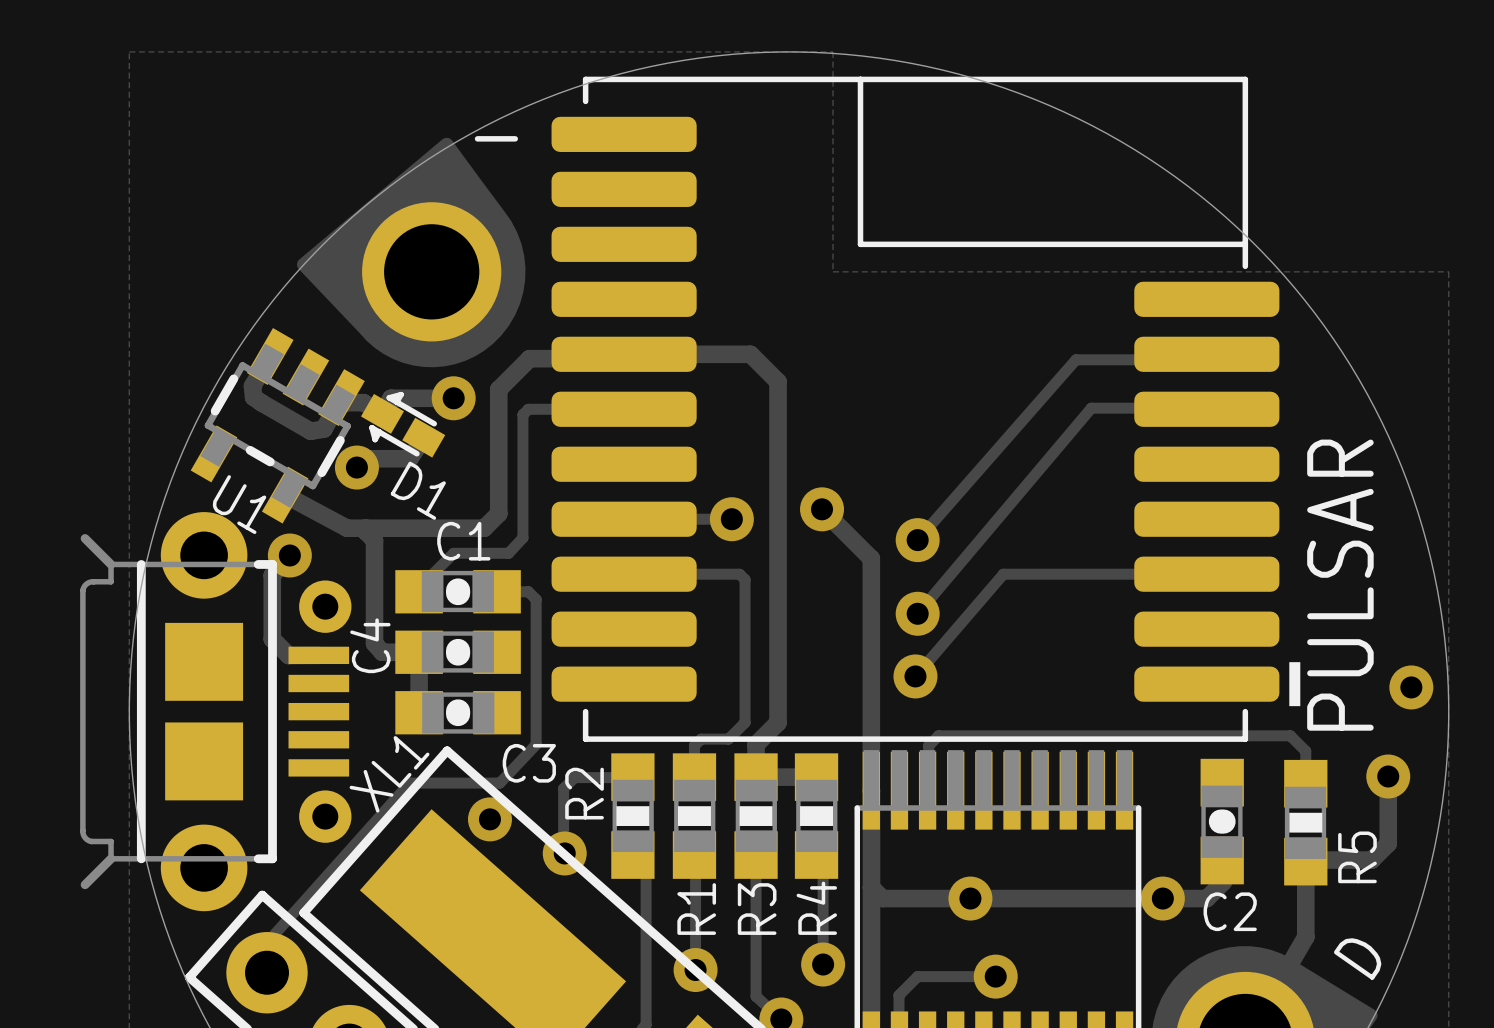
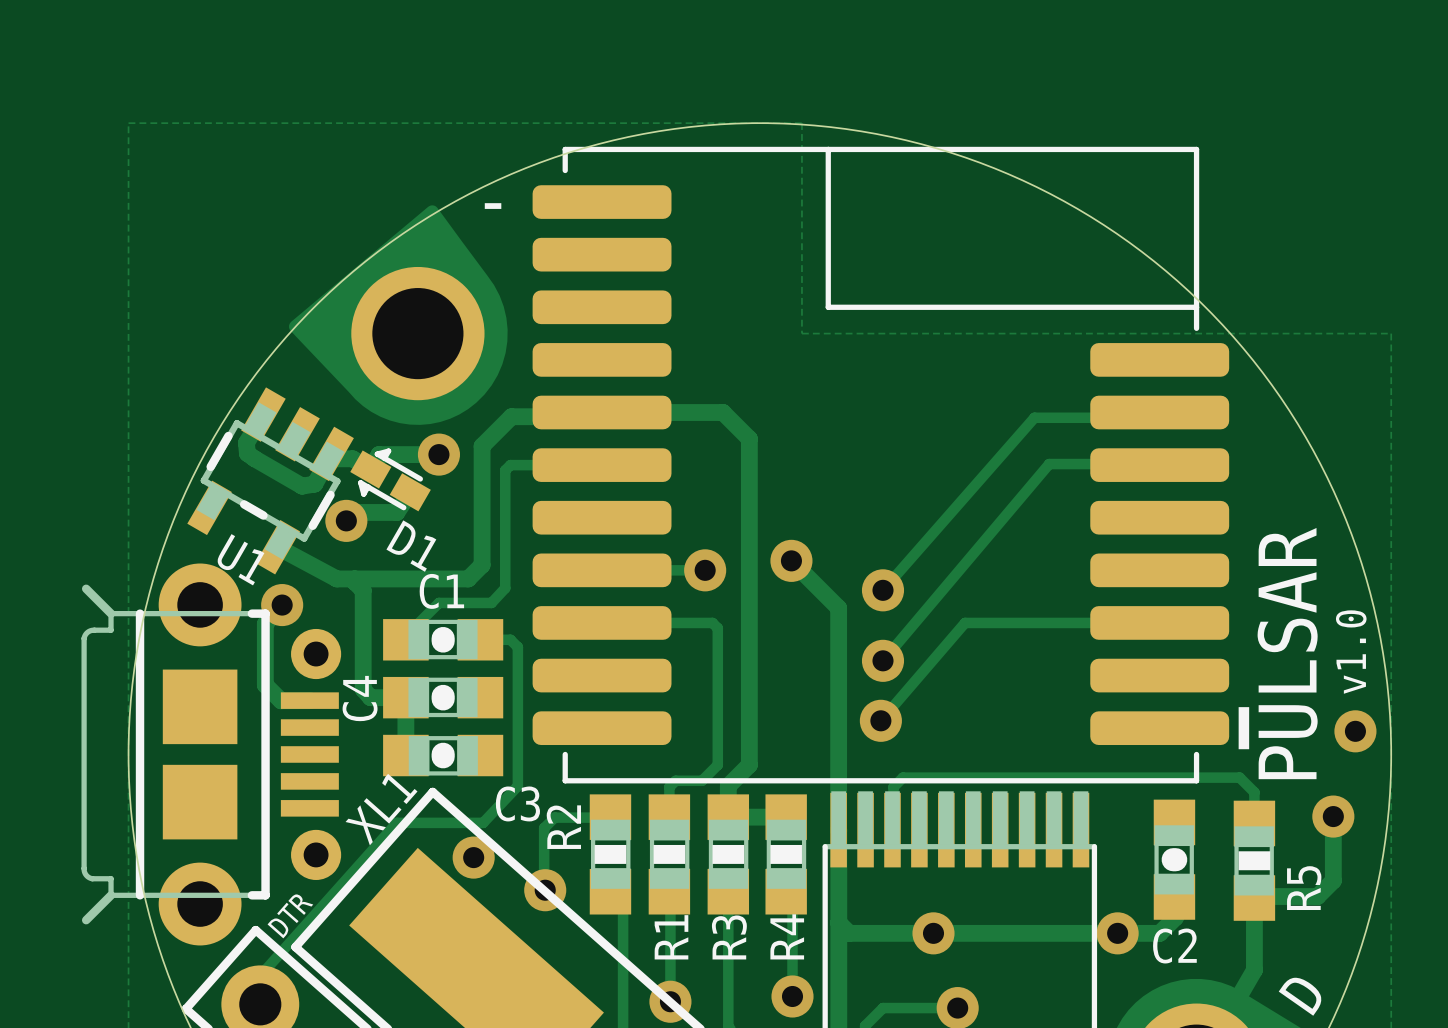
text: none -> v1.0 (1351, 652)
text: none -> DTR (290, 916)

